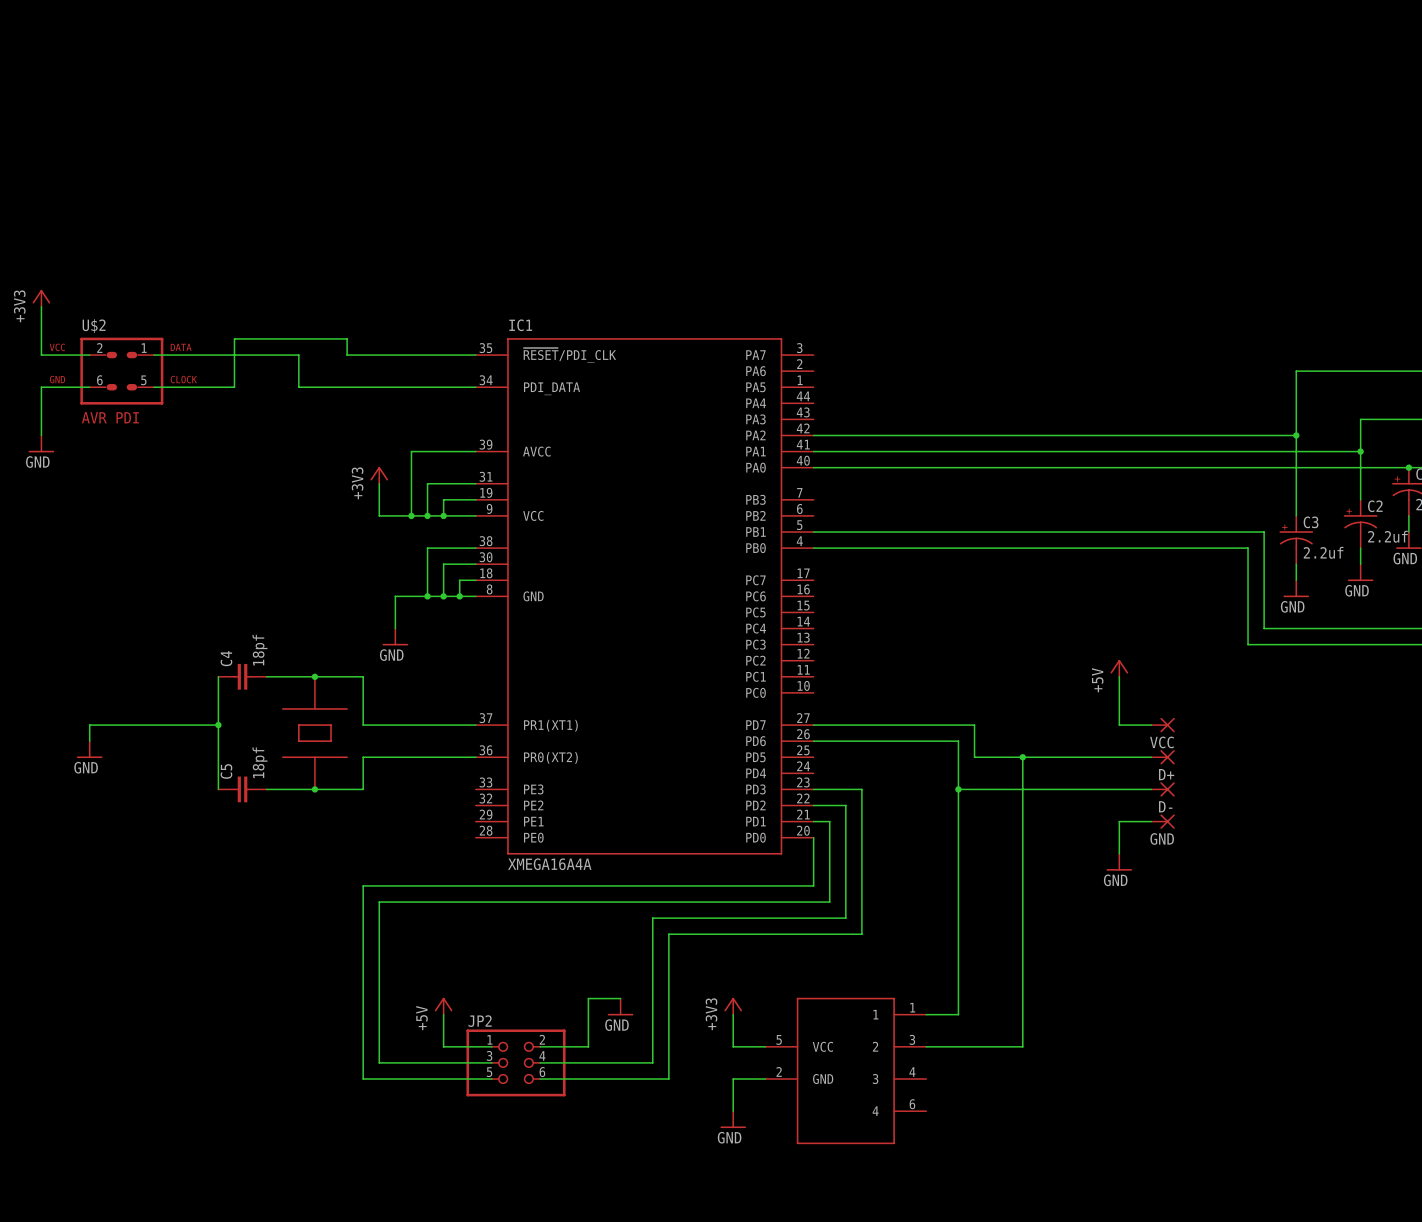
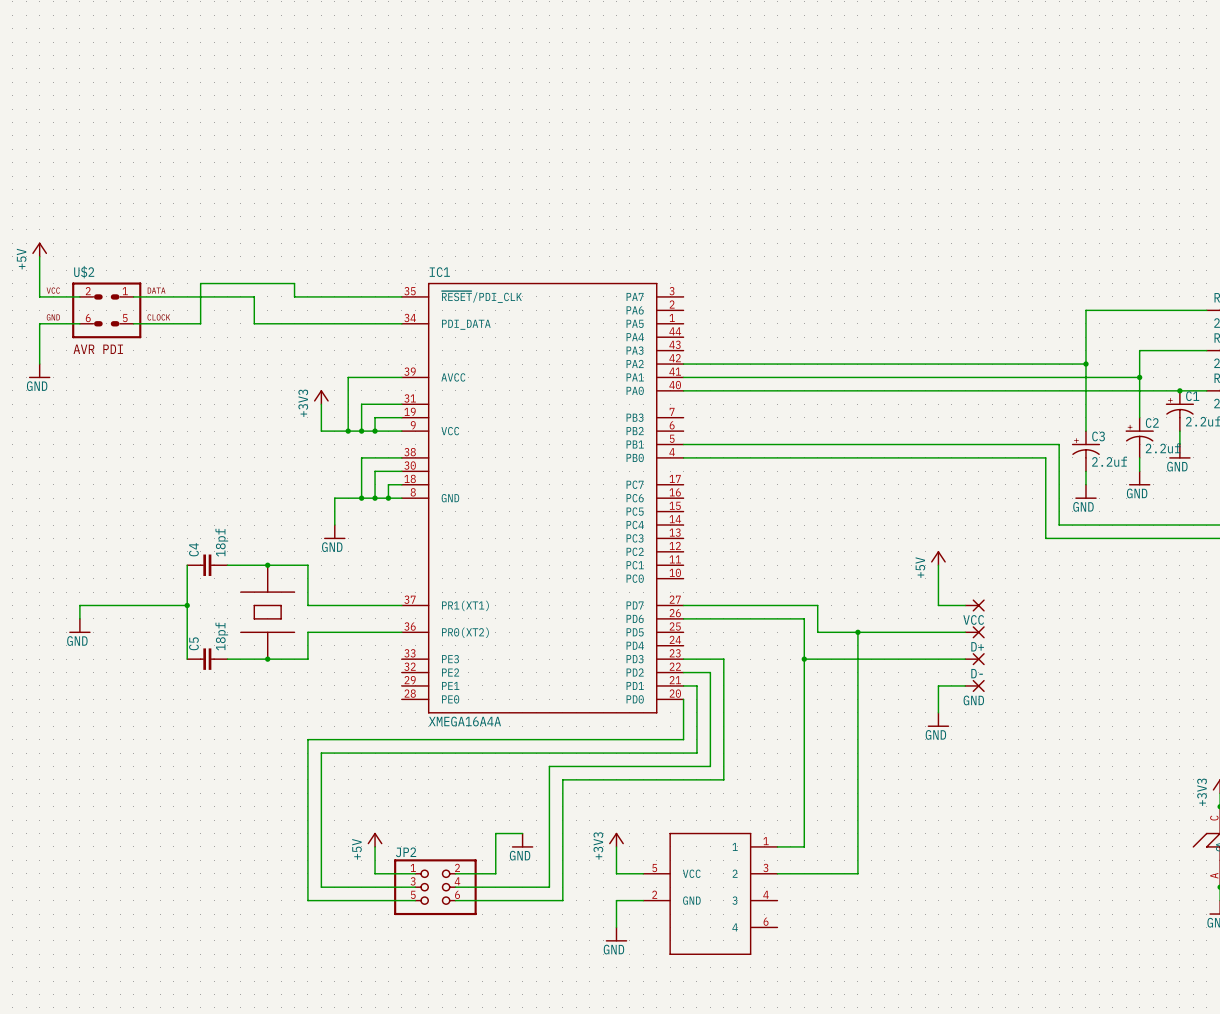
power symbol: +3V3 (41, 298) -> +5V (39, 249)

